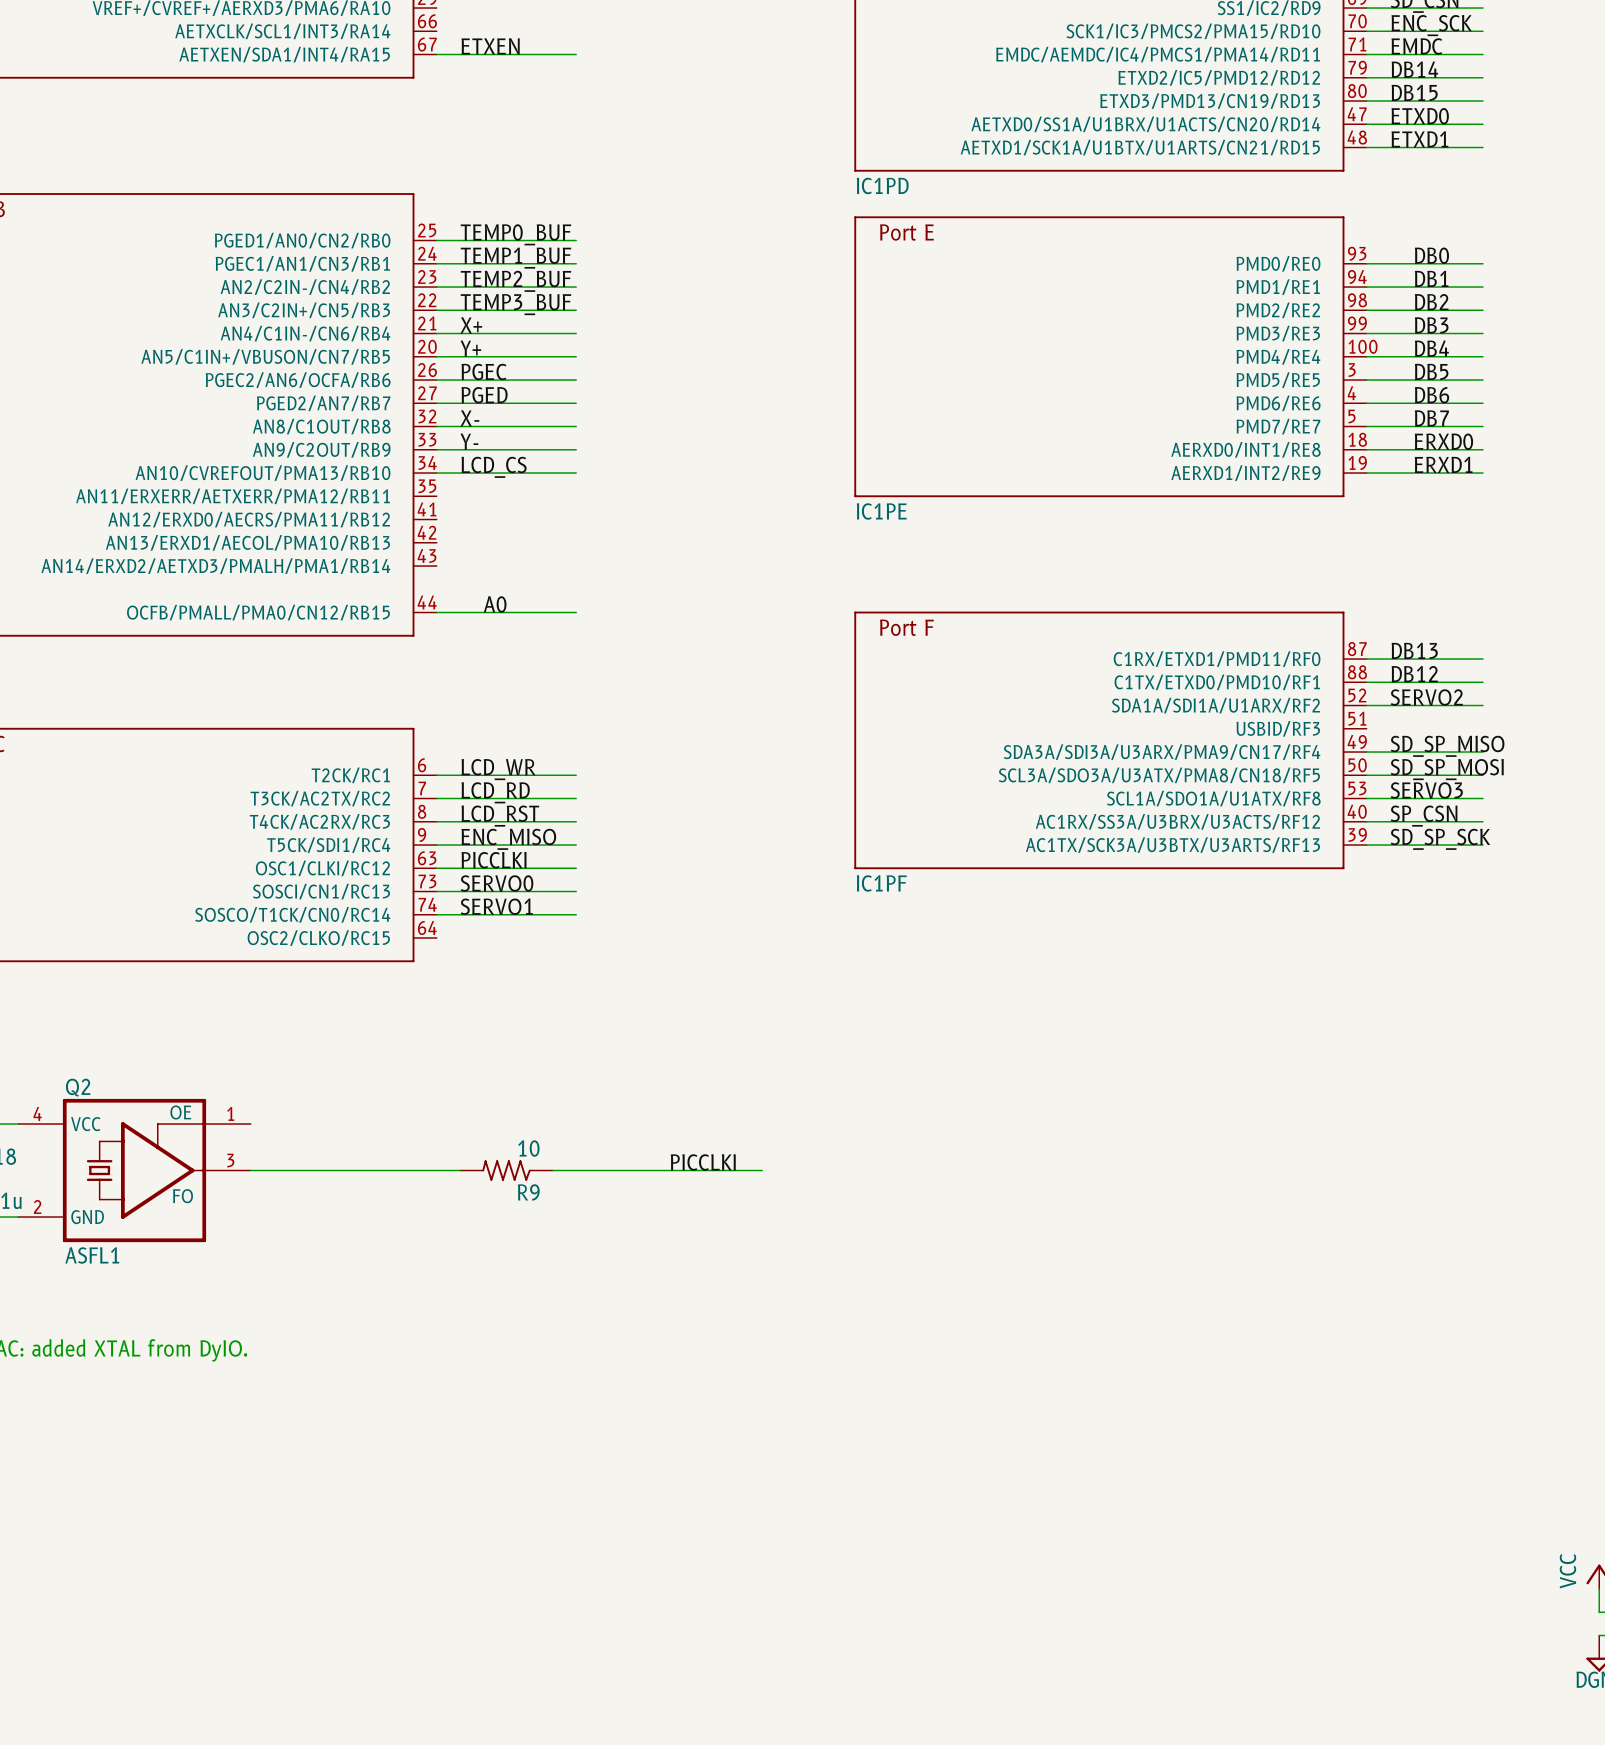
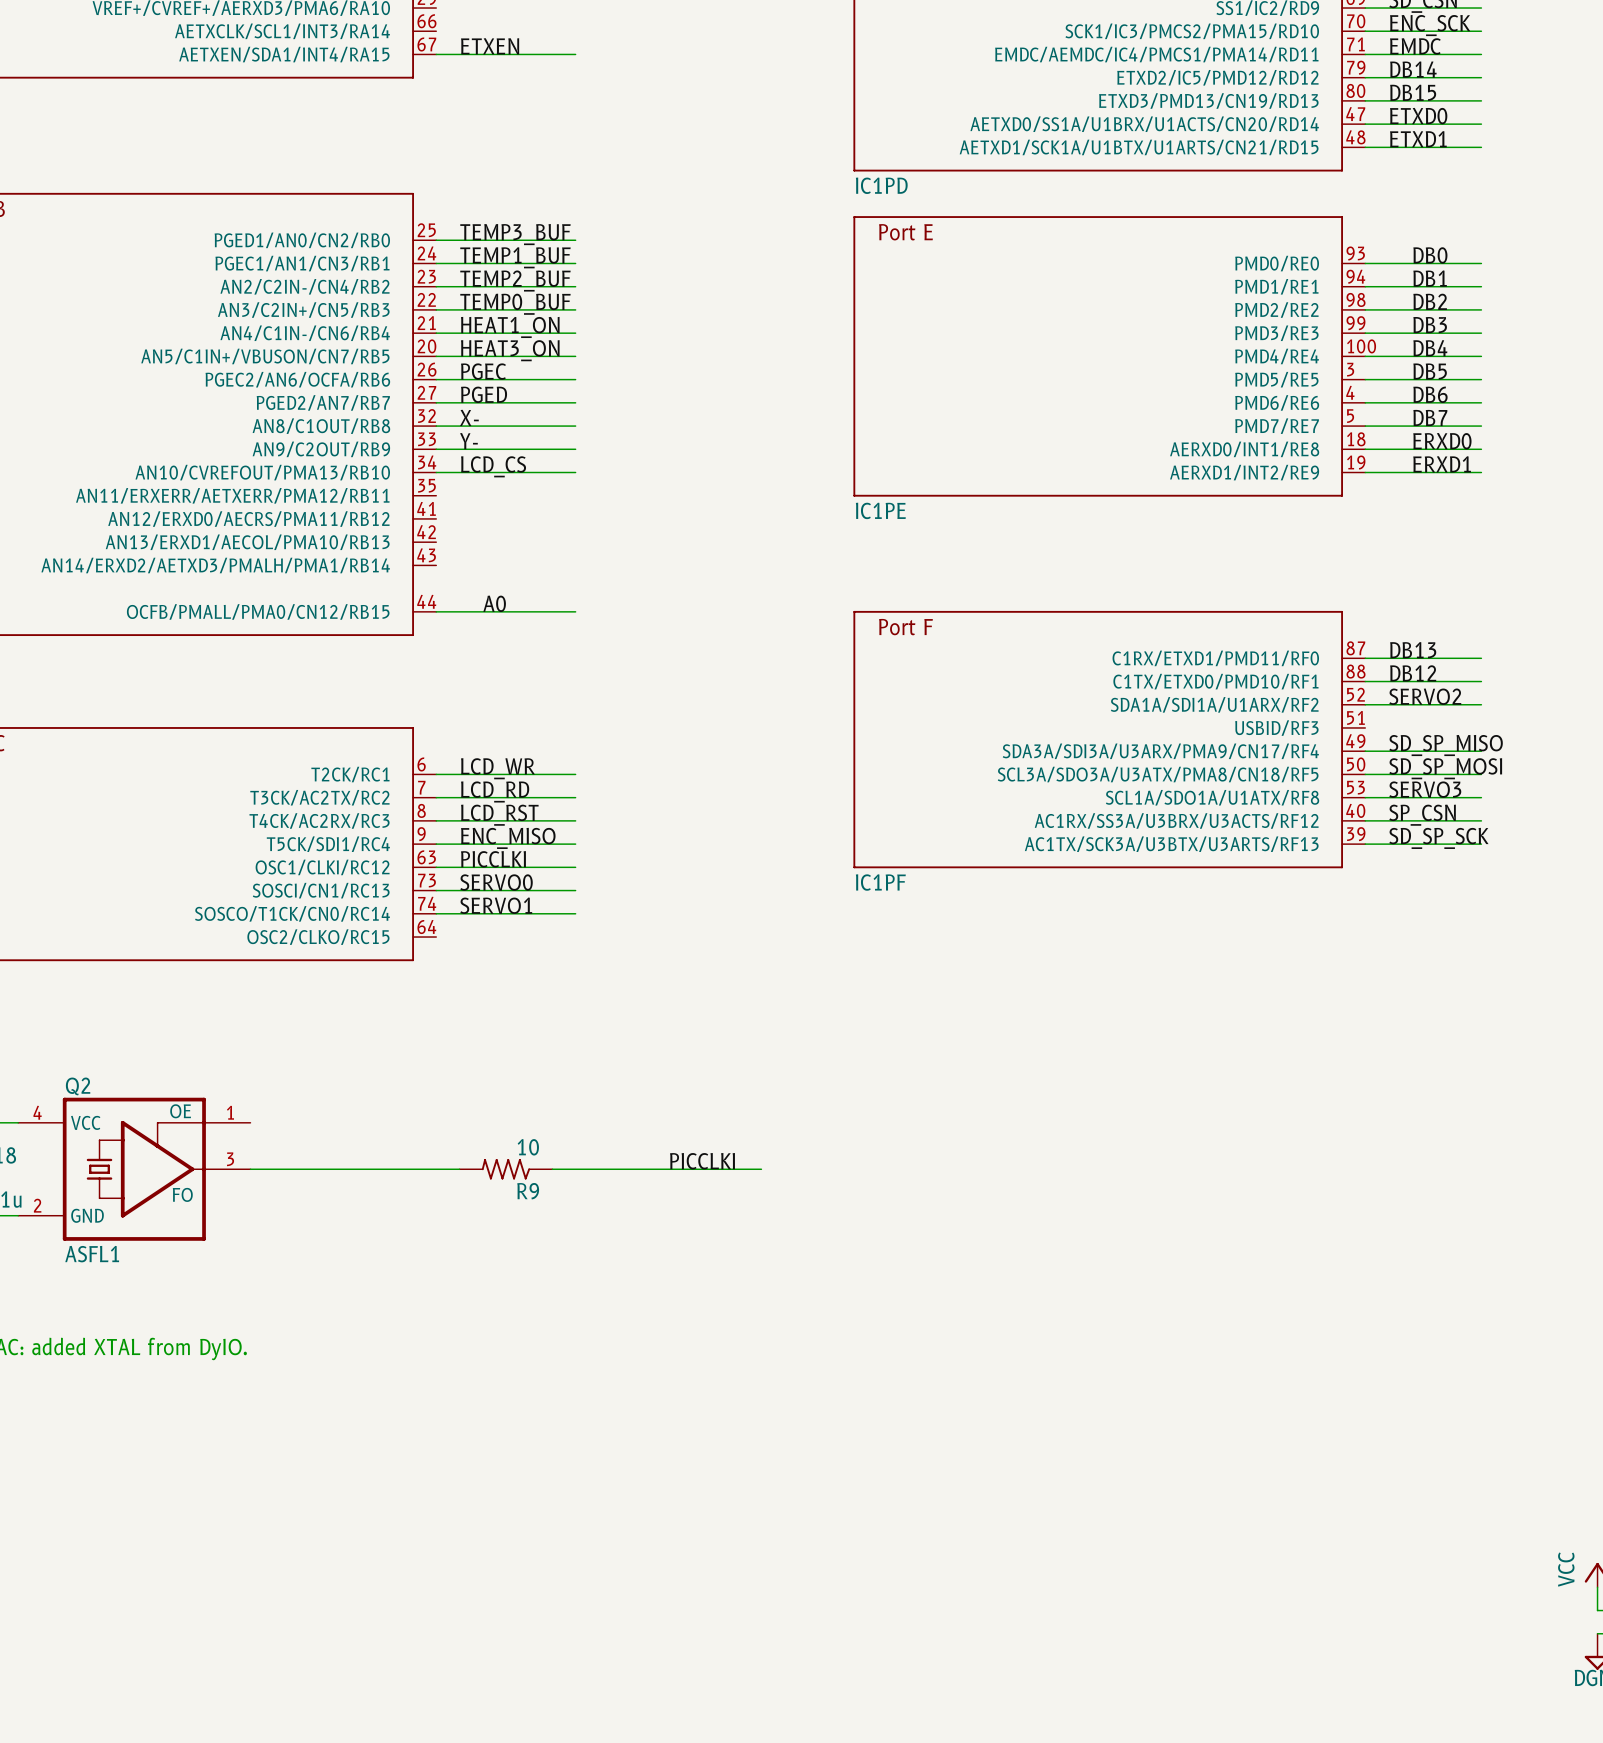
label: TEMP0_BUF (516, 234) -> TEMP3_BUF (515, 234)
label: TEMP3_BUF (516, 304) -> TEMP0_BUF (515, 304)
label: X+ (471, 325) -> HEAT1_ON (510, 327)
label: Y+ (470, 348) -> HEAT3_ON (510, 350)

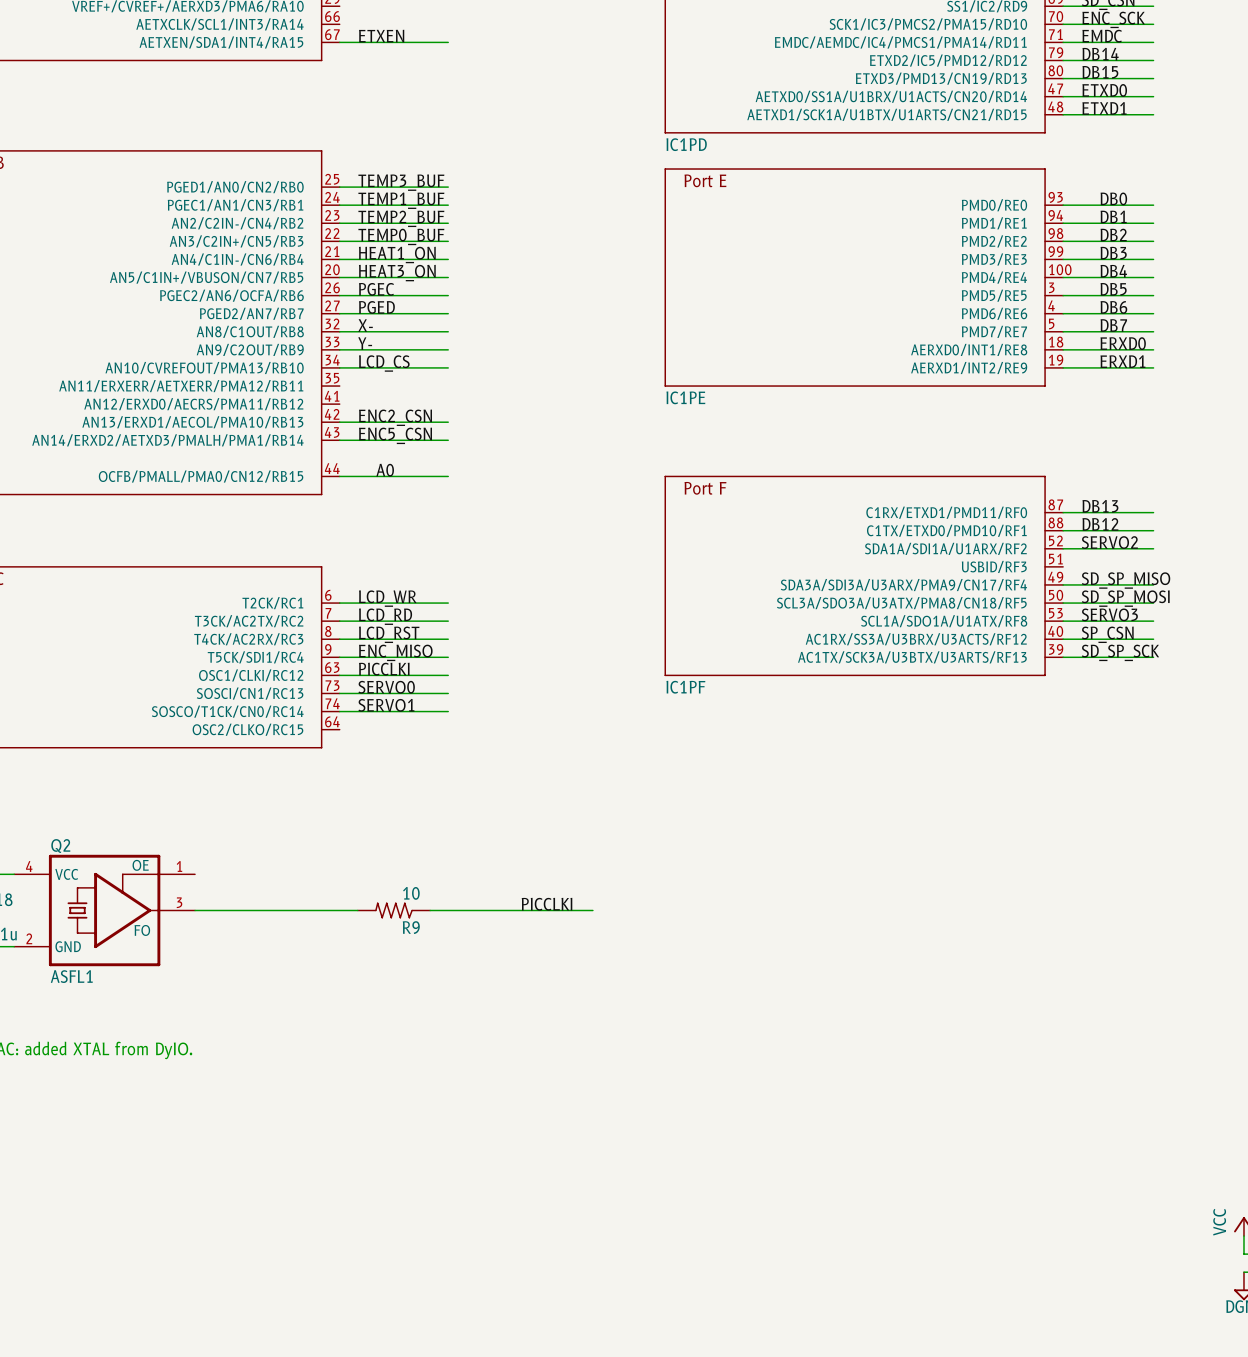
label: none -> ENC2_CSN (395, 417)
wire: none -> (339, 422) (448, 422)
label: none -> ENC5_CSN (395, 435)
wire: none -> (339, 440) (448, 440)

